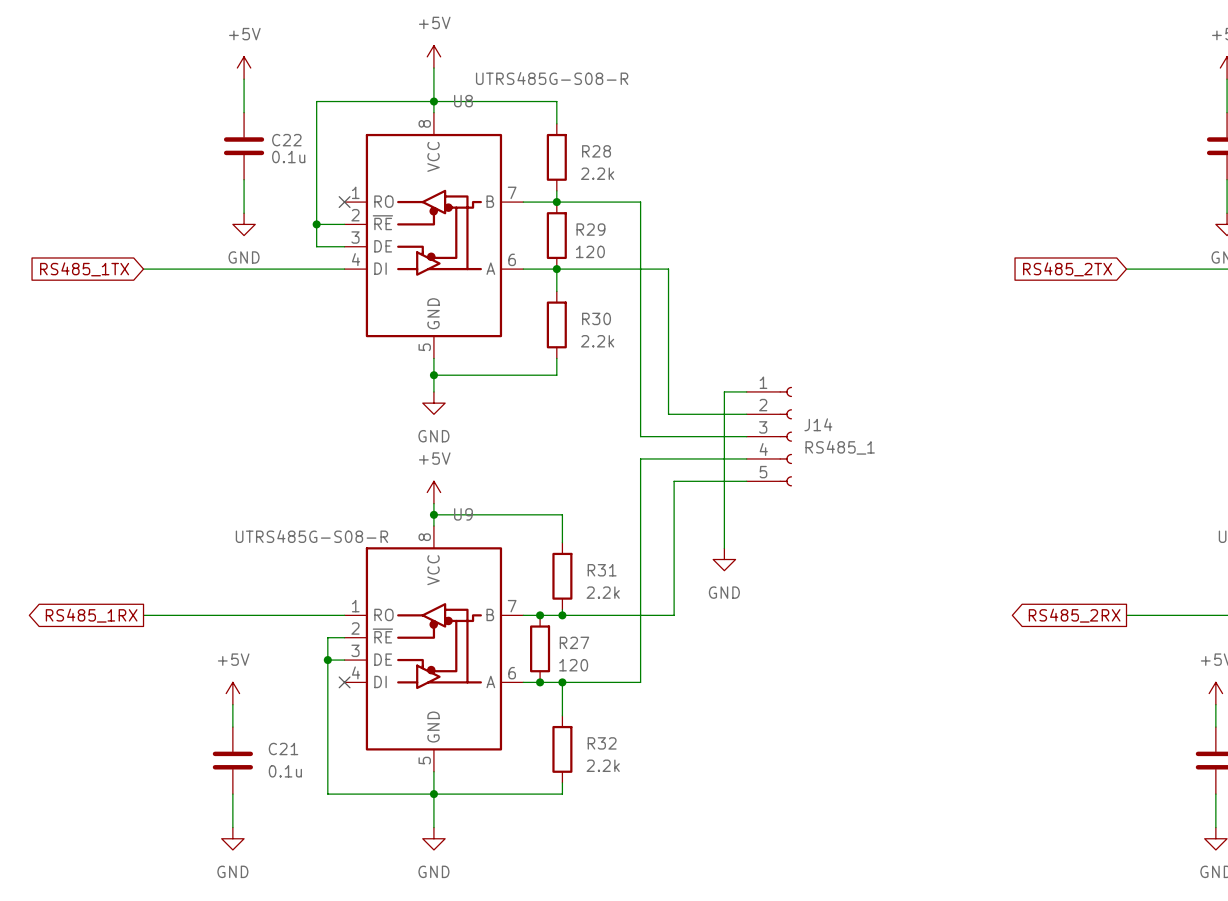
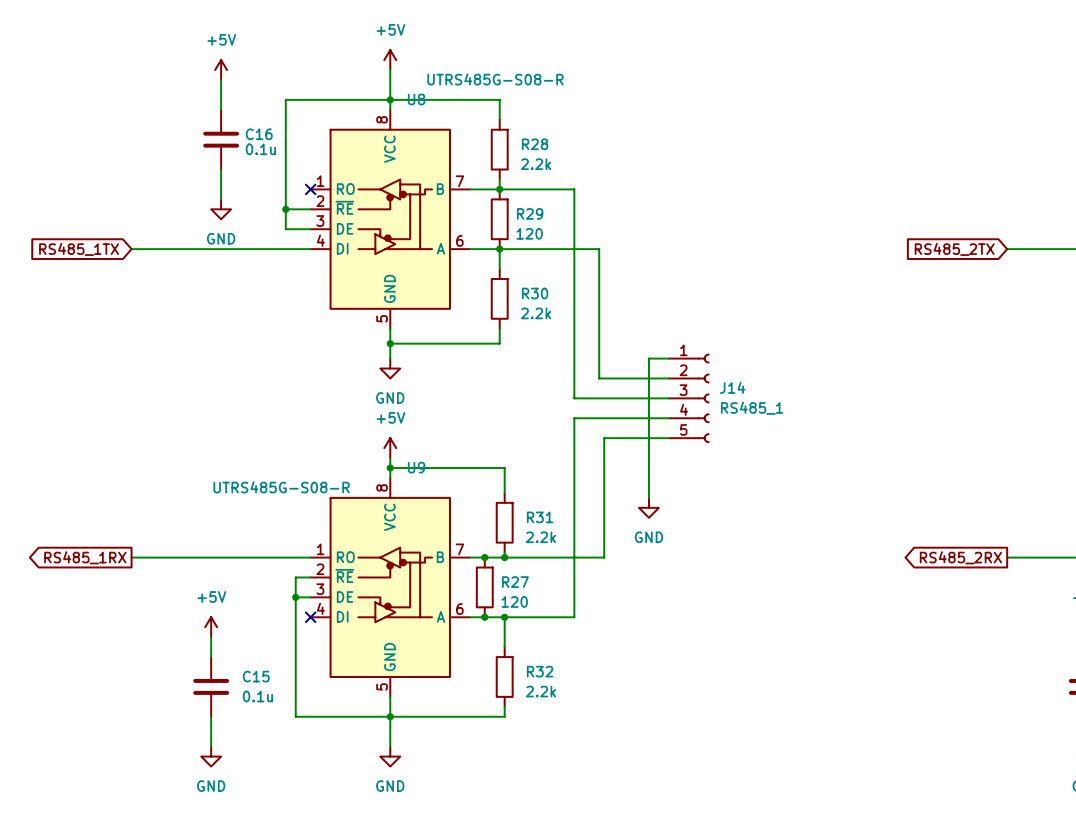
C22 name: C22 (286, 140) -> C16 (259, 134)
C21 name: C21 (283, 748) -> C15 (256, 676)

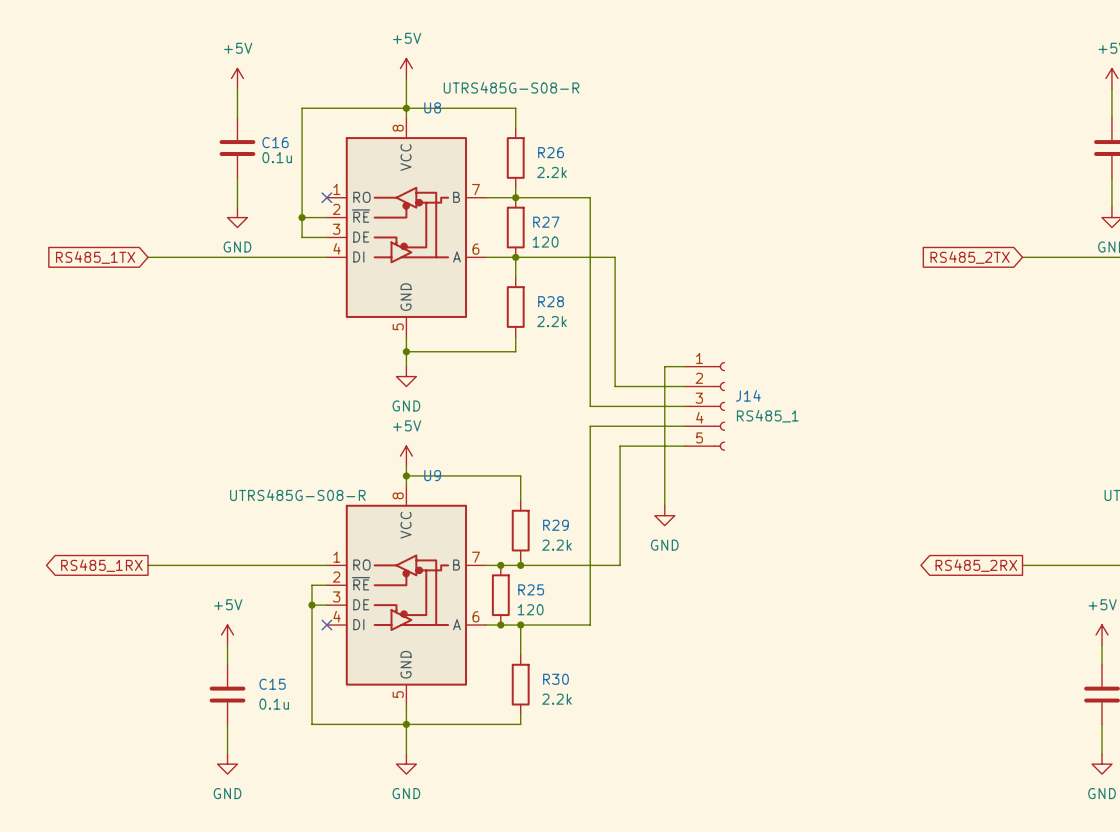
R28 name: R28 (535, 144) -> R26 (551, 152)
R29 name: R29 (530, 213) -> R27 (546, 222)
R30 name: R30 (535, 293) -> R28 (551, 301)
R31 name: R31 (540, 517) -> R29 (556, 525)
R27 name: R27 (515, 582) -> R25 (531, 589)
R32 name: R32 (540, 671) -> R30 (556, 679)

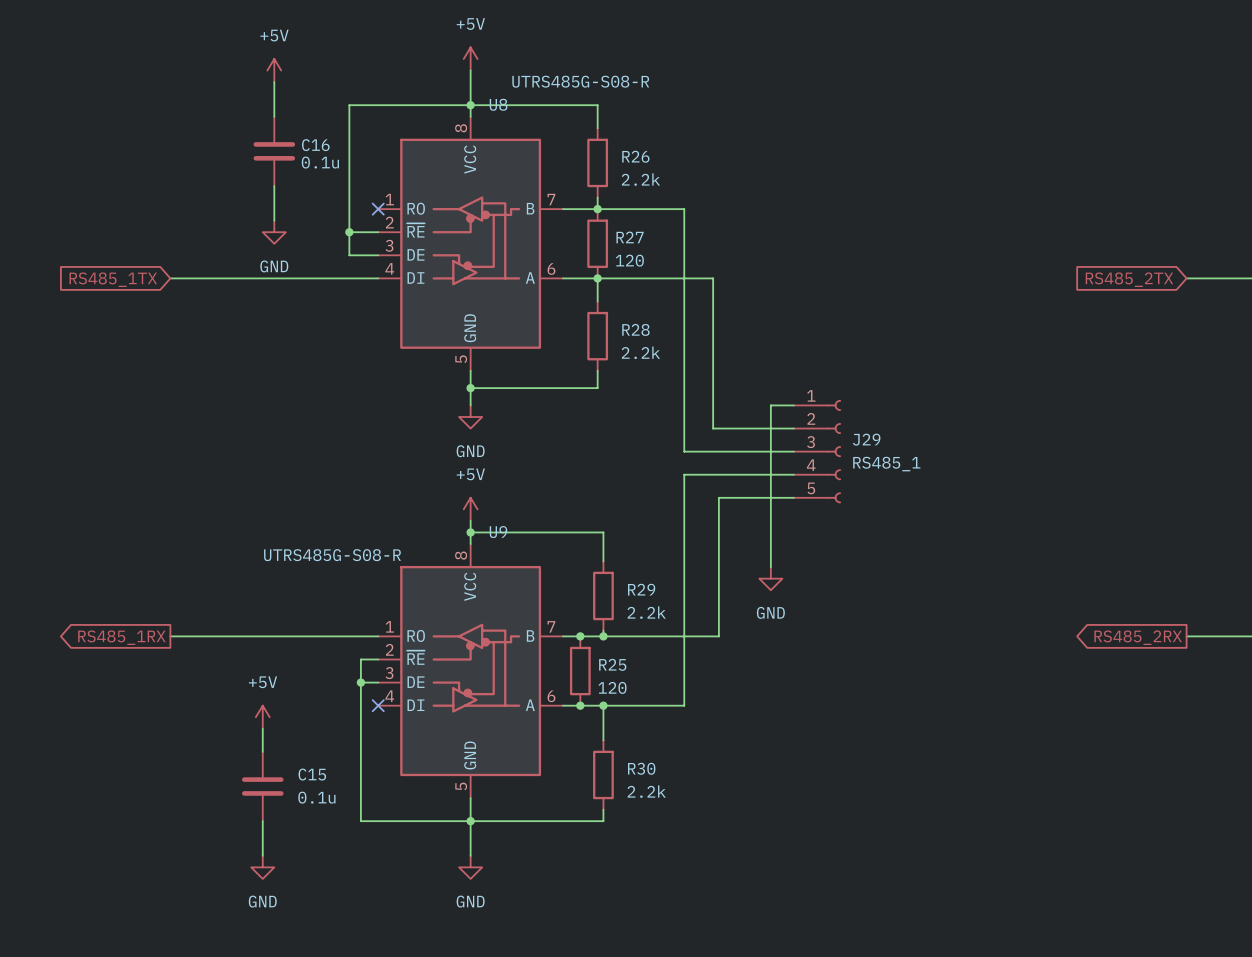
J14 name: J14 (748, 395) -> J29 (866, 439)

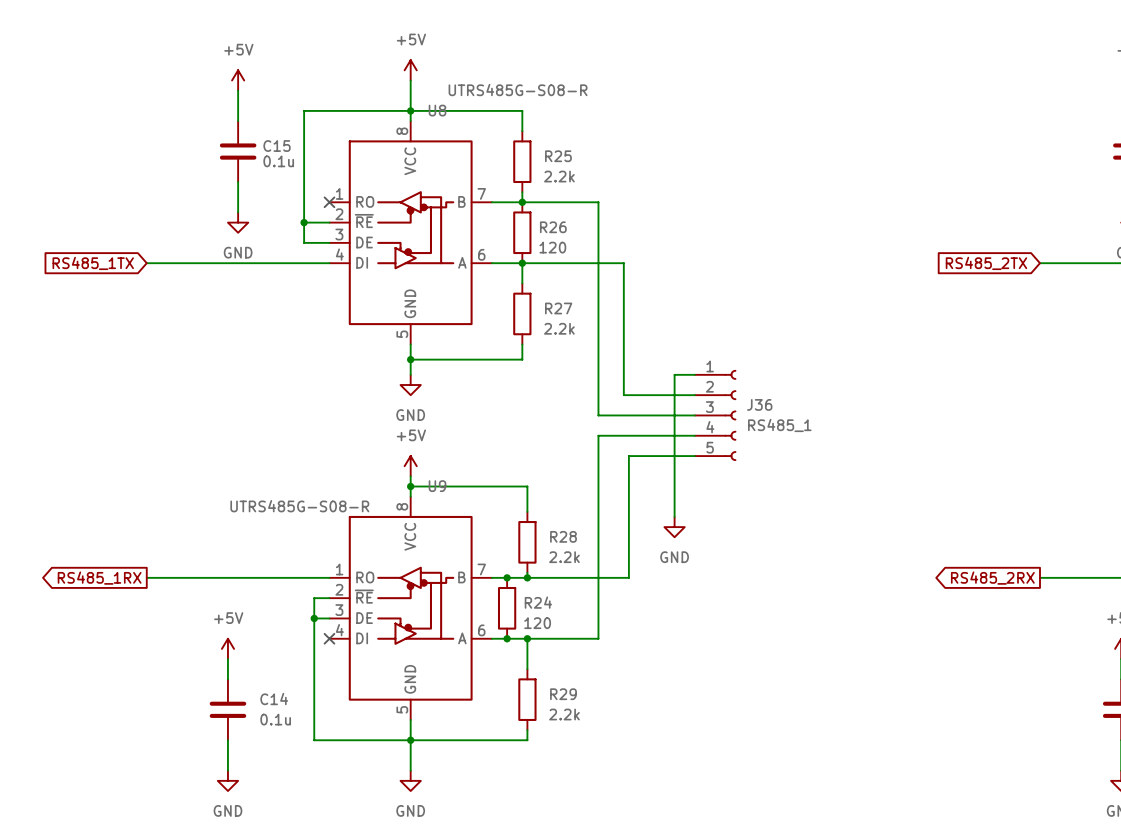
C16 name: C16 (315, 145) -> C15 (277, 146)
R26 name: R26 (635, 156) -> R25 (558, 156)
R27 name: R27 (630, 237) -> R26 (553, 227)
R28 name: R28 (635, 329) -> R27 (558, 308)
J29 name: J29 (866, 439) -> J36 (759, 404)
R29 name: R29 (641, 589) -> R28 (563, 536)
R25 name: R25 (612, 664) -> R24 (538, 602)
R30 name: R30 (641, 768) -> R29 (563, 694)
C15 name: C15 (312, 774) -> C14 (274, 699)

